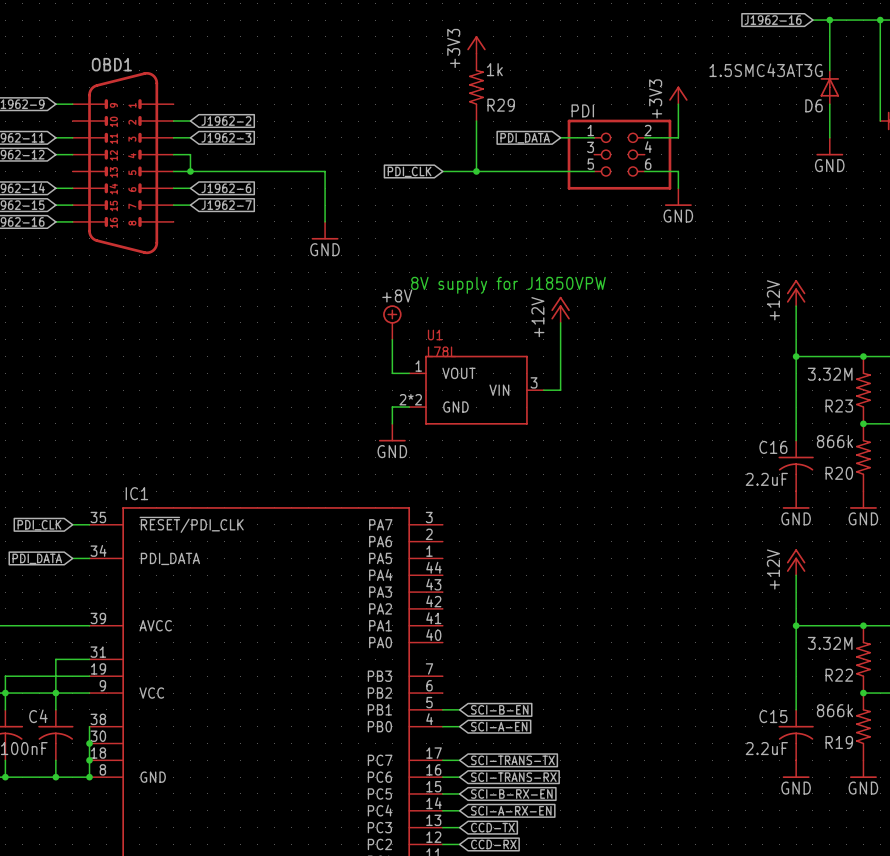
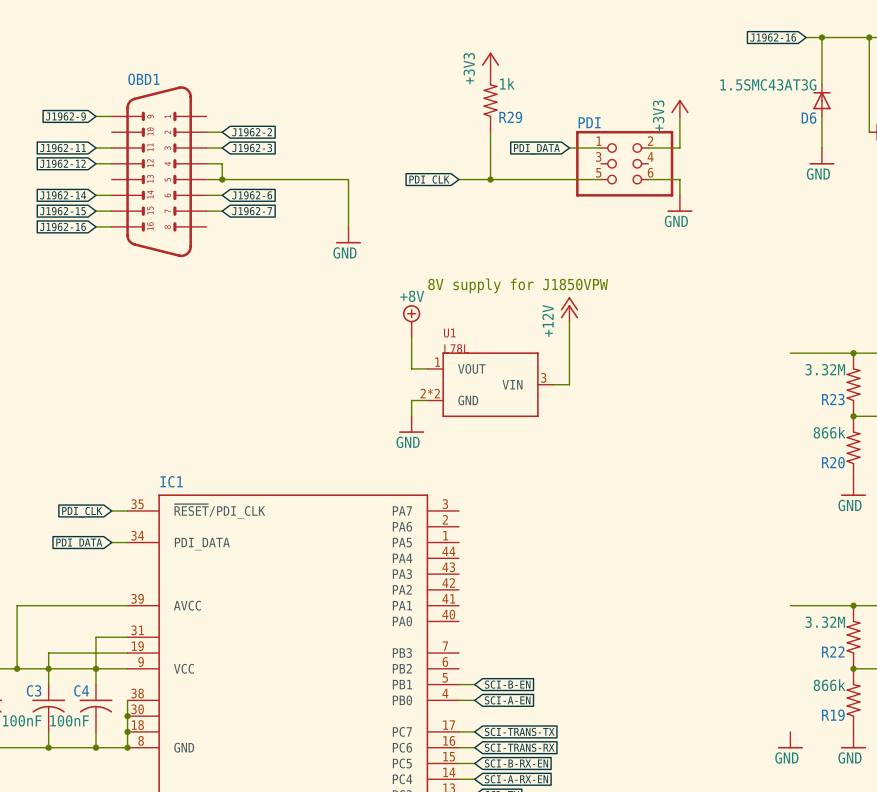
power symbol: +12V (796, 293) -> none
wire: (796, 306) (796, 440) -> none
junction: (796, 356) -> none
C16: 2.2uF (796, 465) -> none
power symbol: GND (796, 499) -> none
power symbol: +12V (796, 562) -> none
wire: (796, 575) (796, 709) -> none
junction: (796, 625) -> none
C15: 2.2uF (796, 735) -> none

